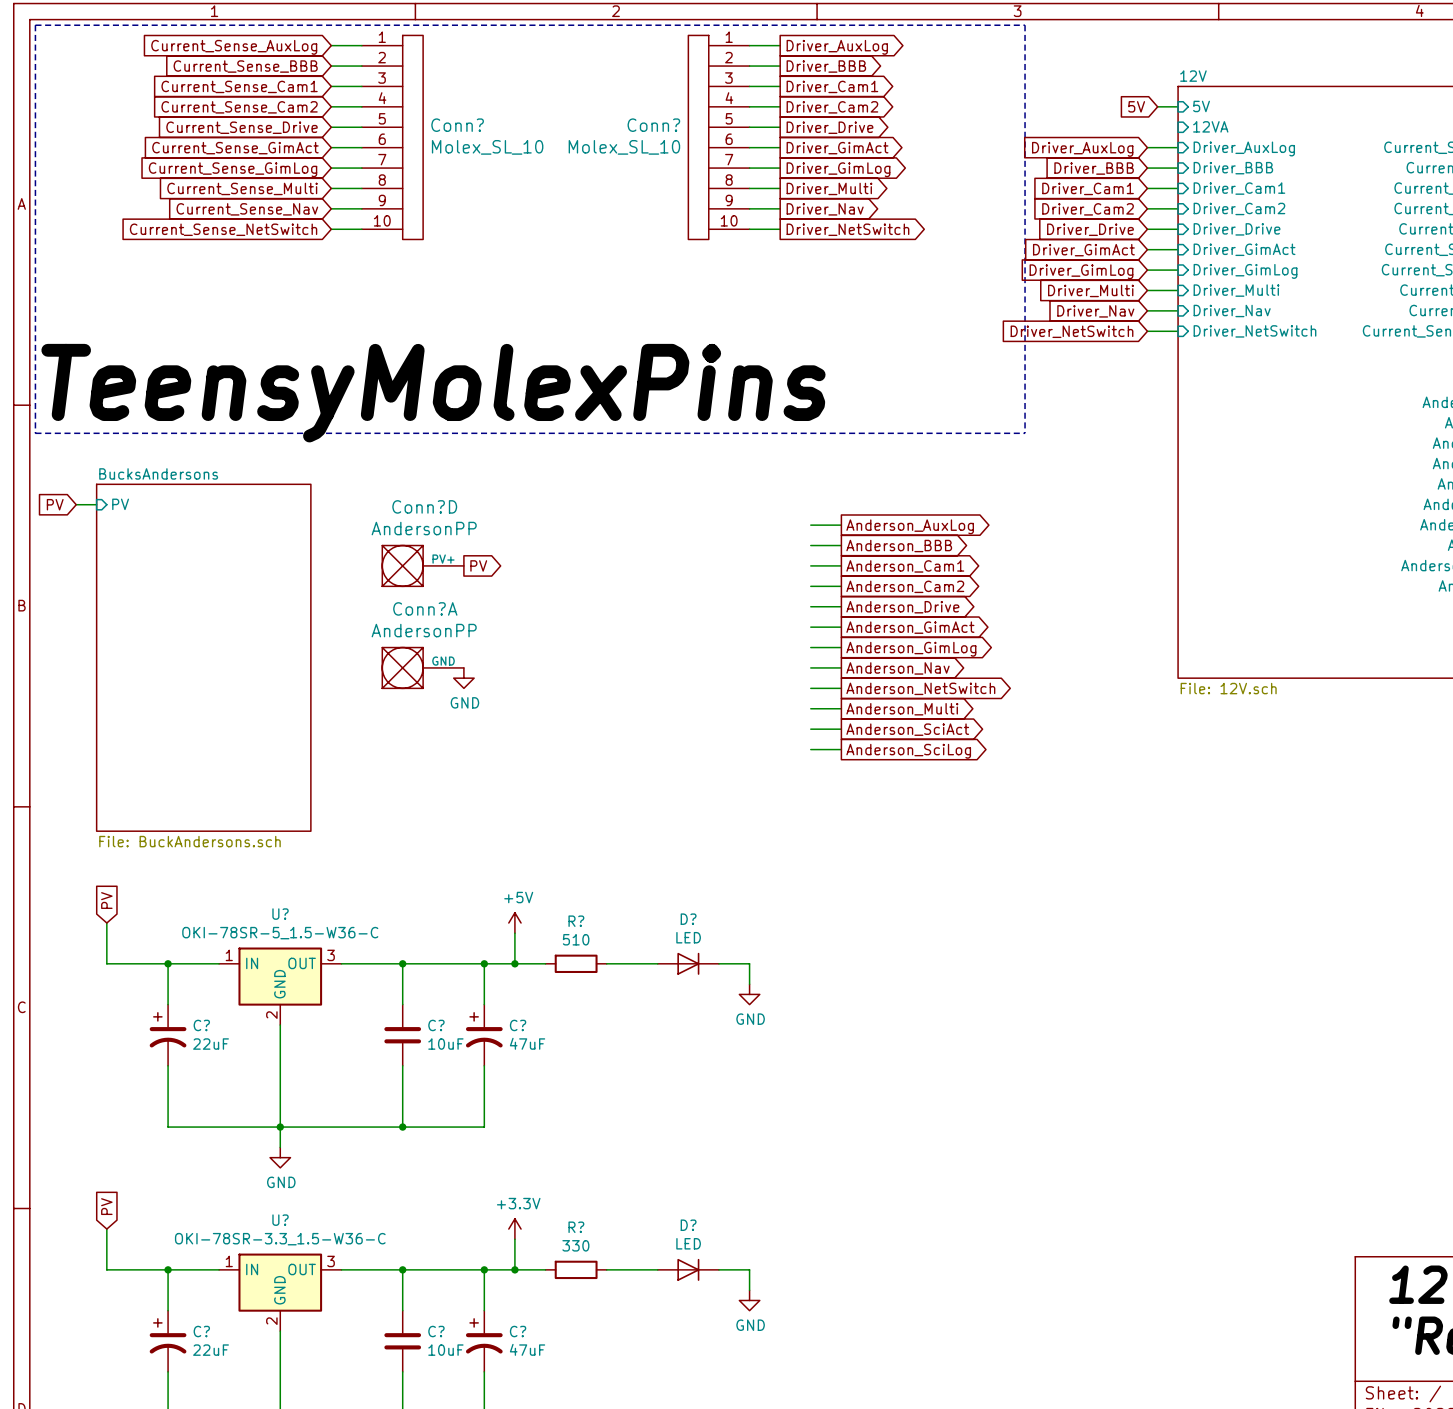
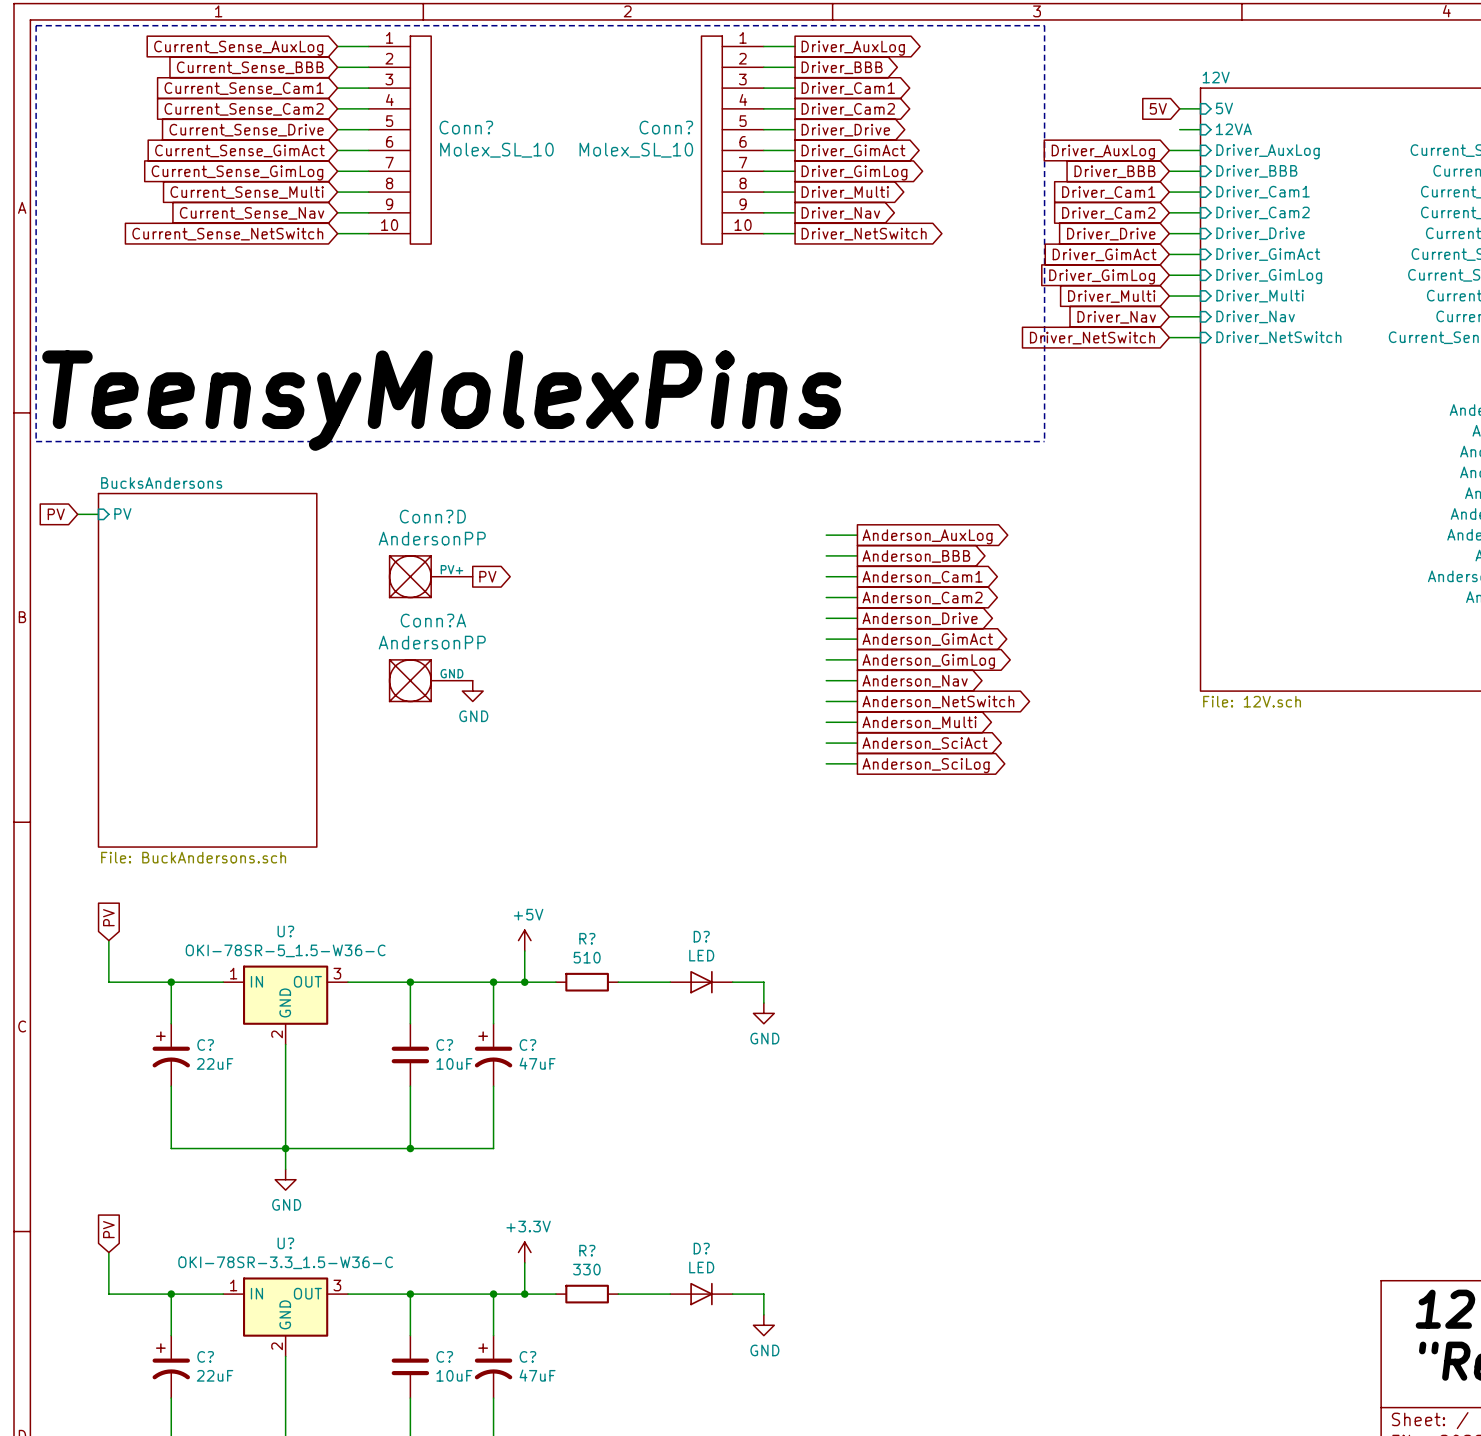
wire: none -> (1179, 129) (1200, 129)

